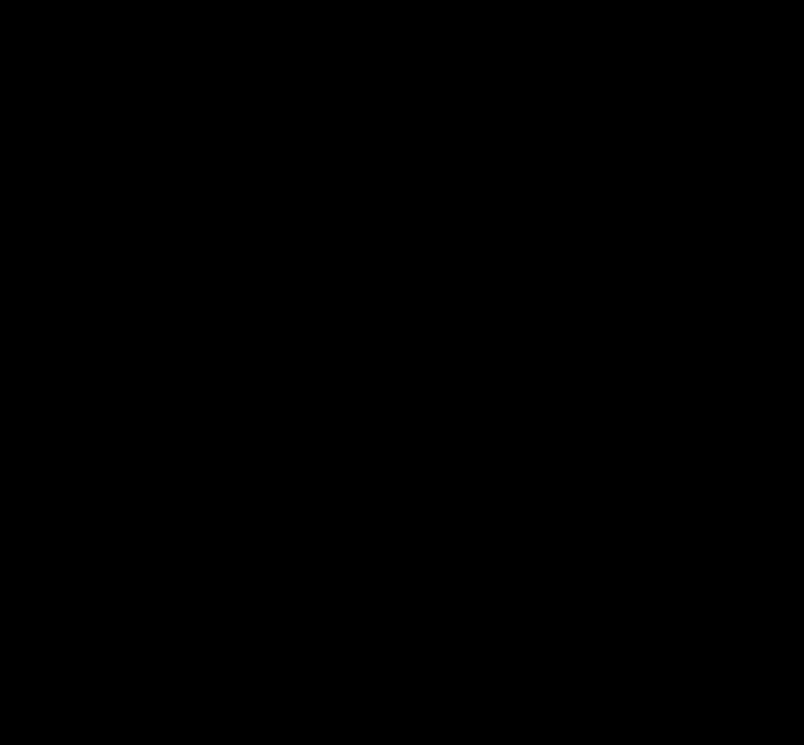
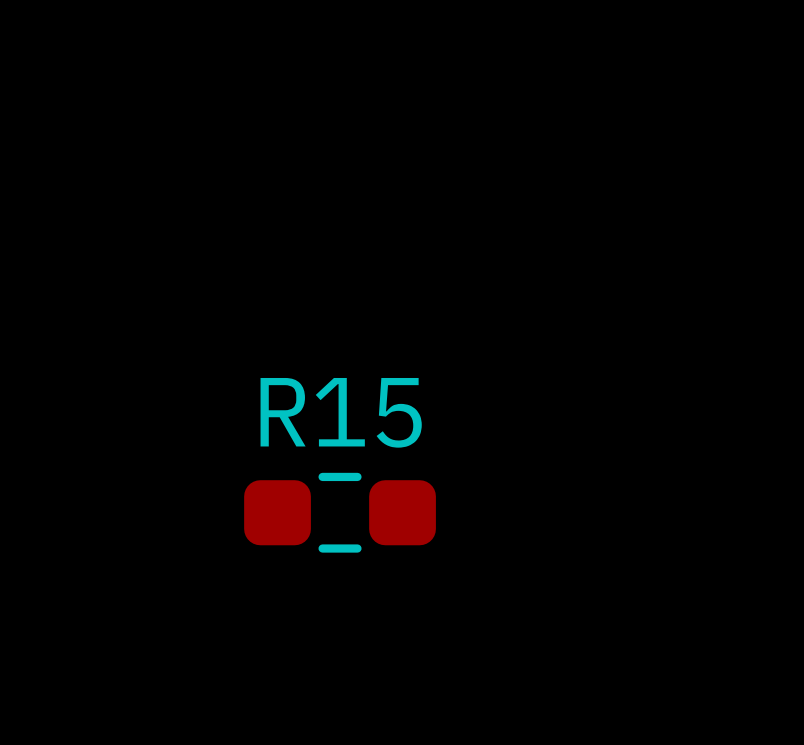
R15: none -> (340, 512)

